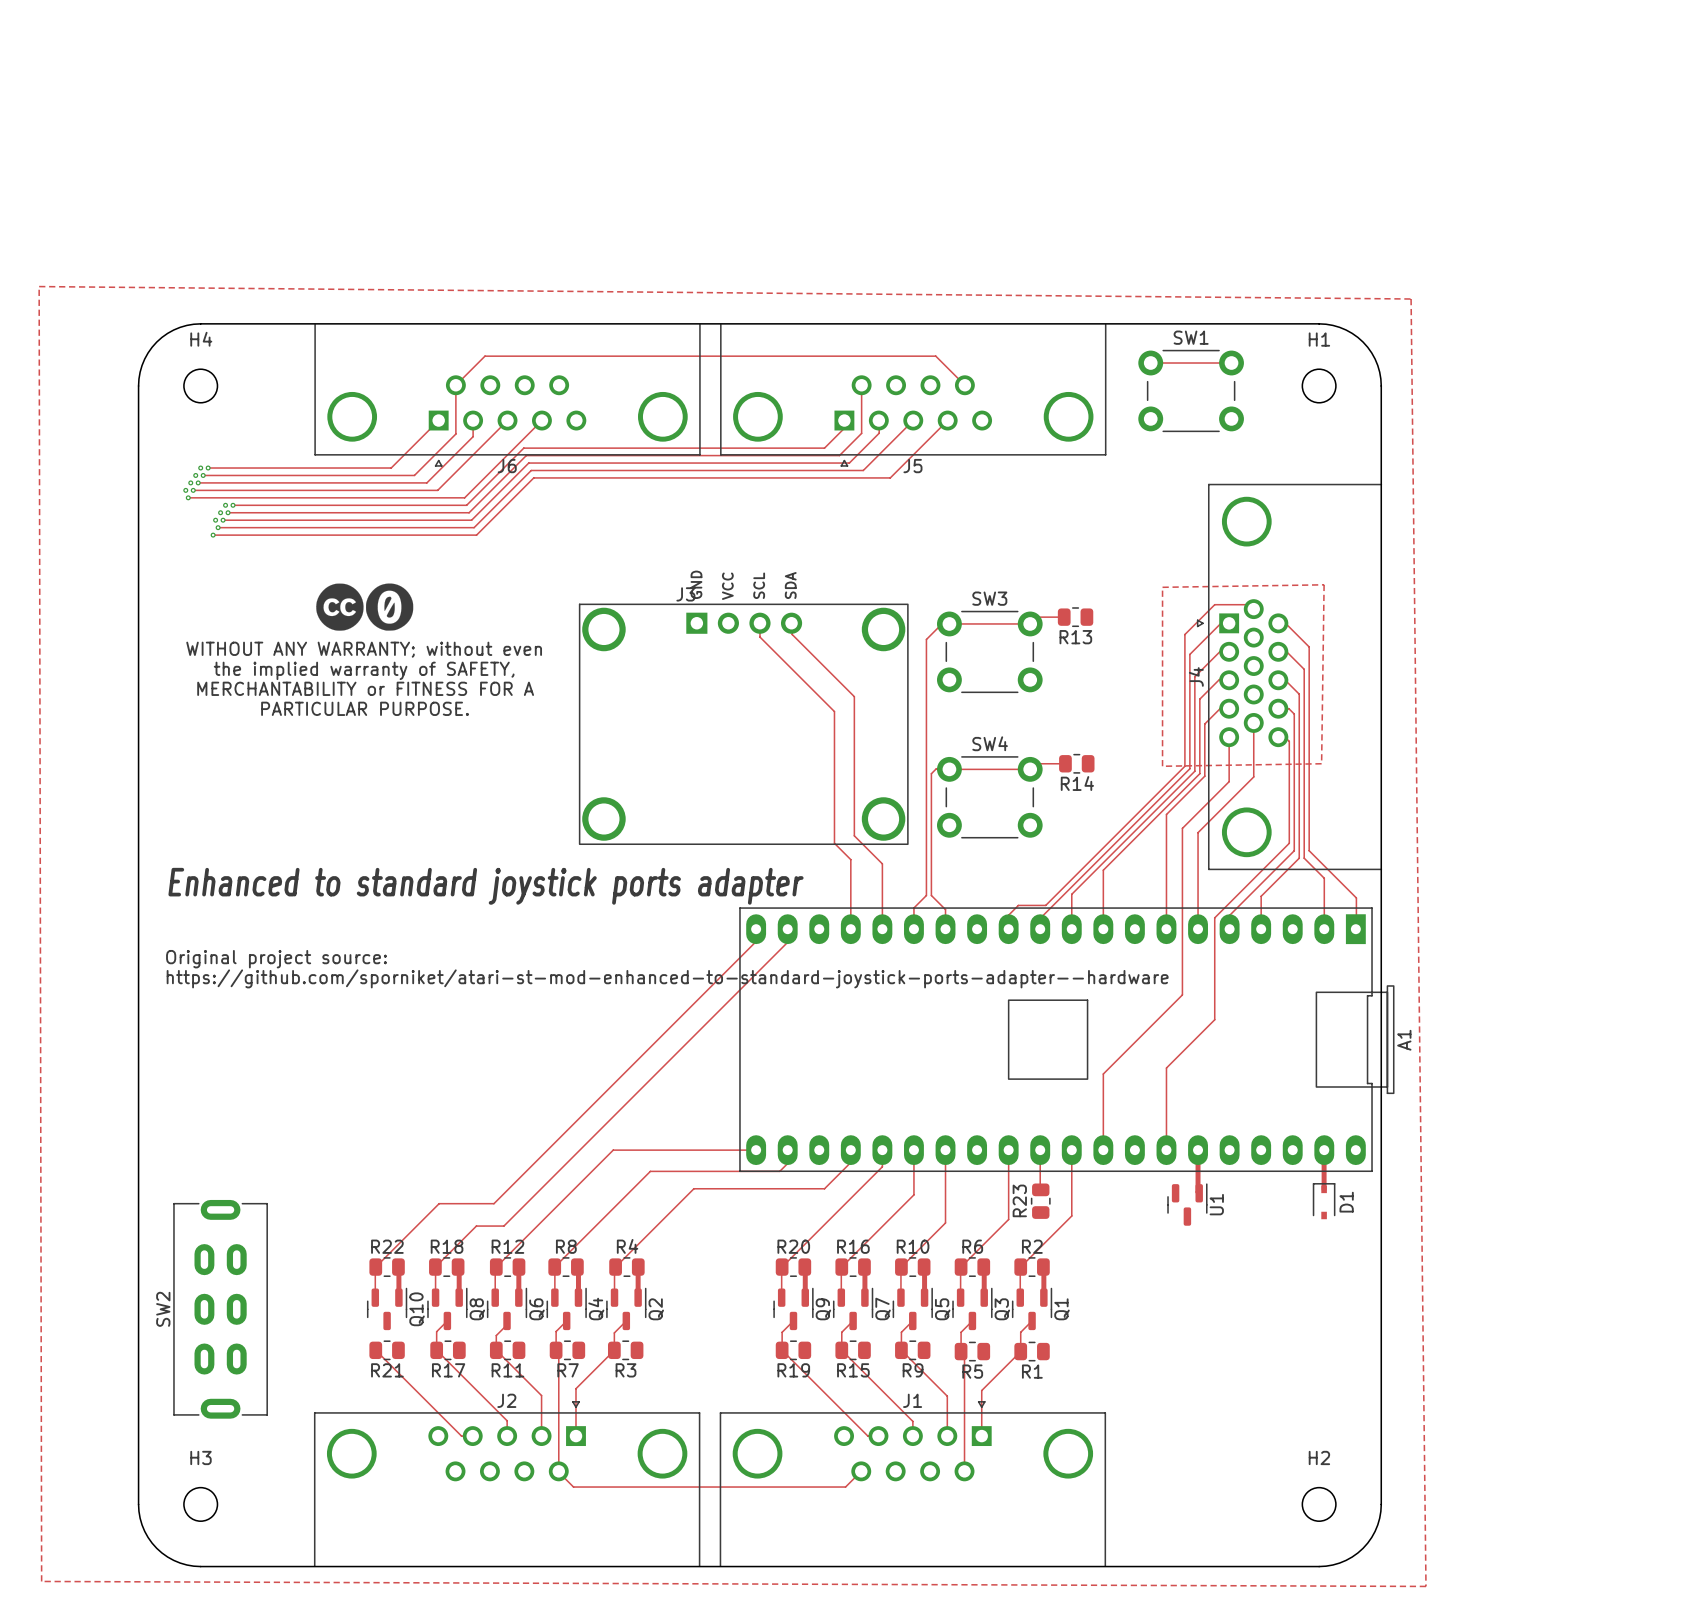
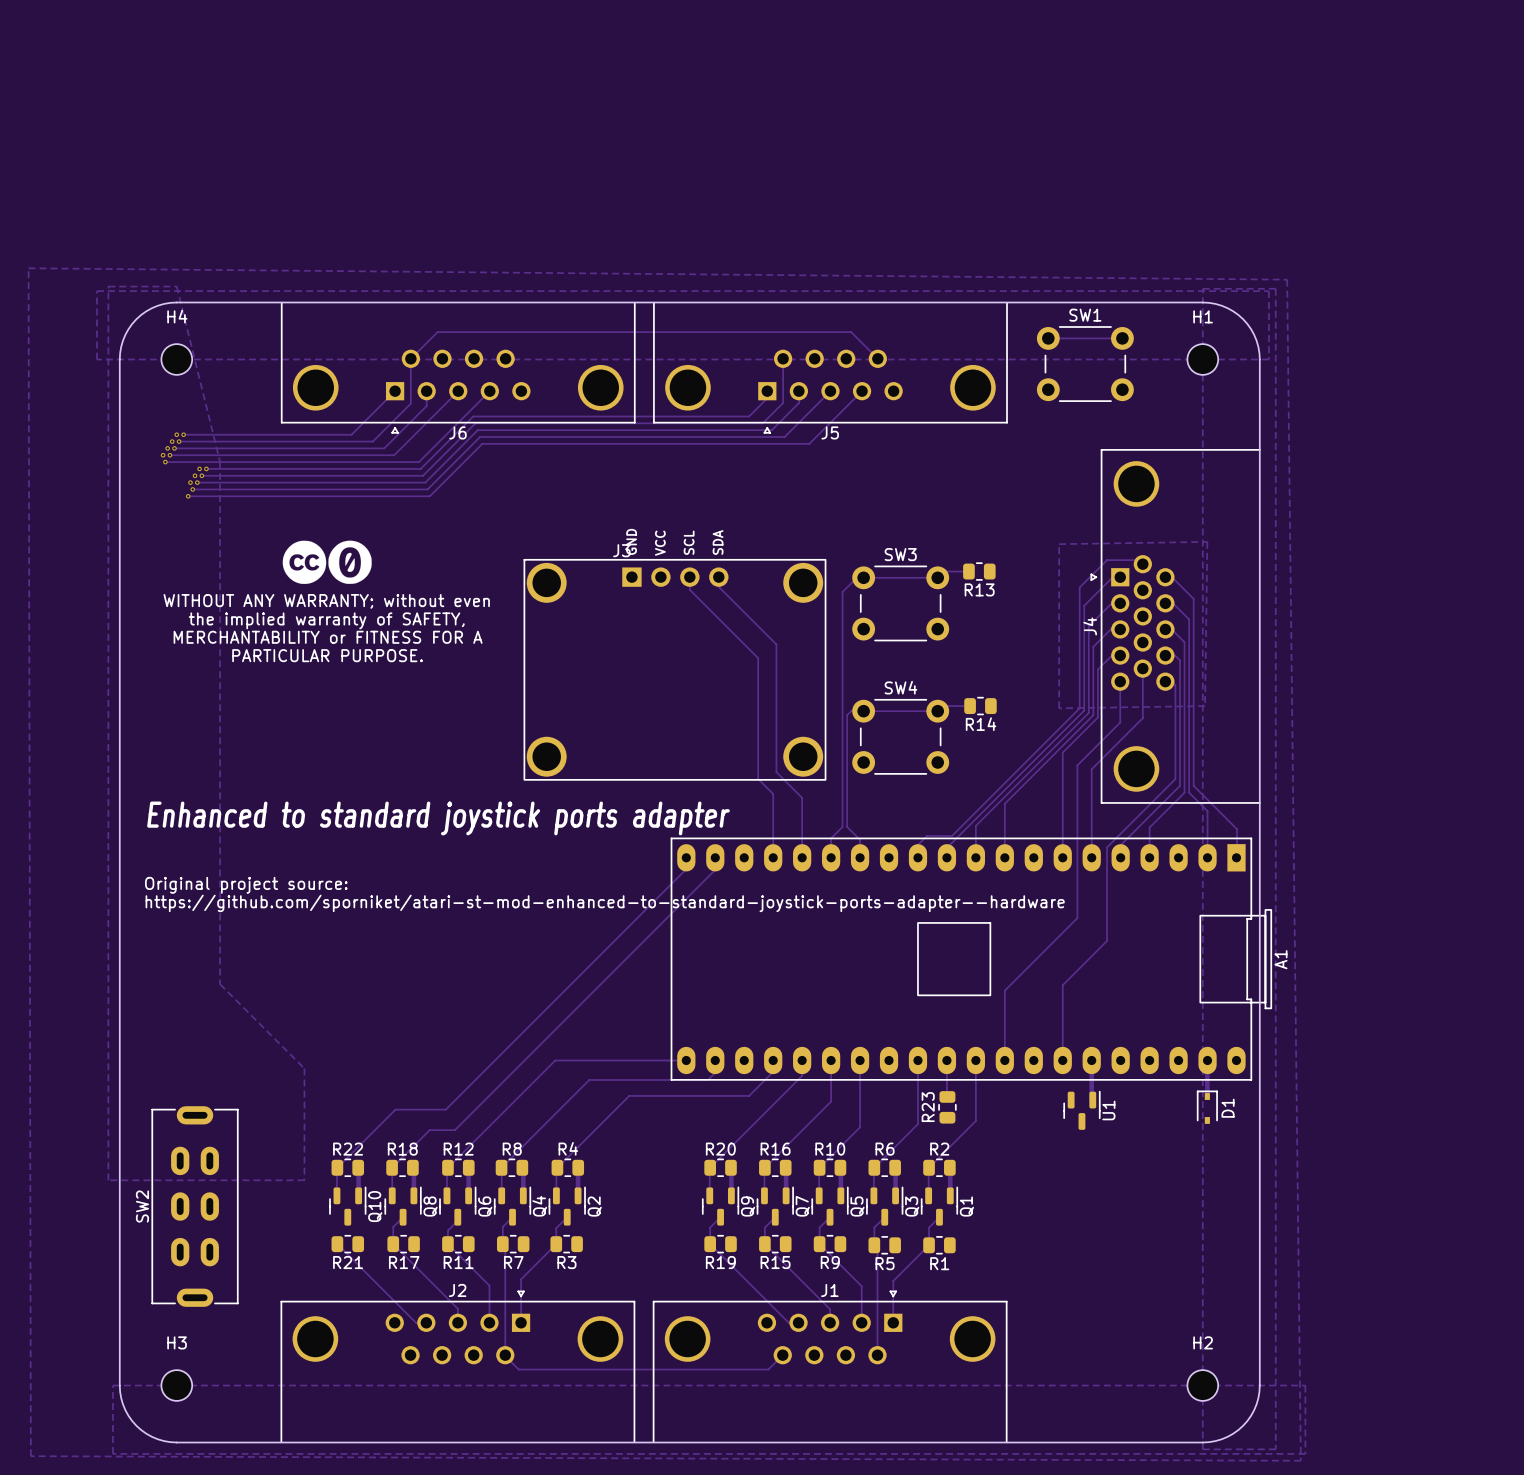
zone outline: none -> (108, 286) (108, 1180) (304, 1180) (304, 1068) (220, 984) (220, 462) (176, 286) (108, 286)
zone outline: none -> (1202, 288) (1202, 1449) (1275, 1449) (1275, 288) (1202, 288)
zone outline: none -> (96, 291) (96, 359) (1268, 359) (1268, 291) (96, 291)
zone outline: none -> (112, 1385) (112, 1453) (1305, 1453) (1305, 1385) (112, 1385)

